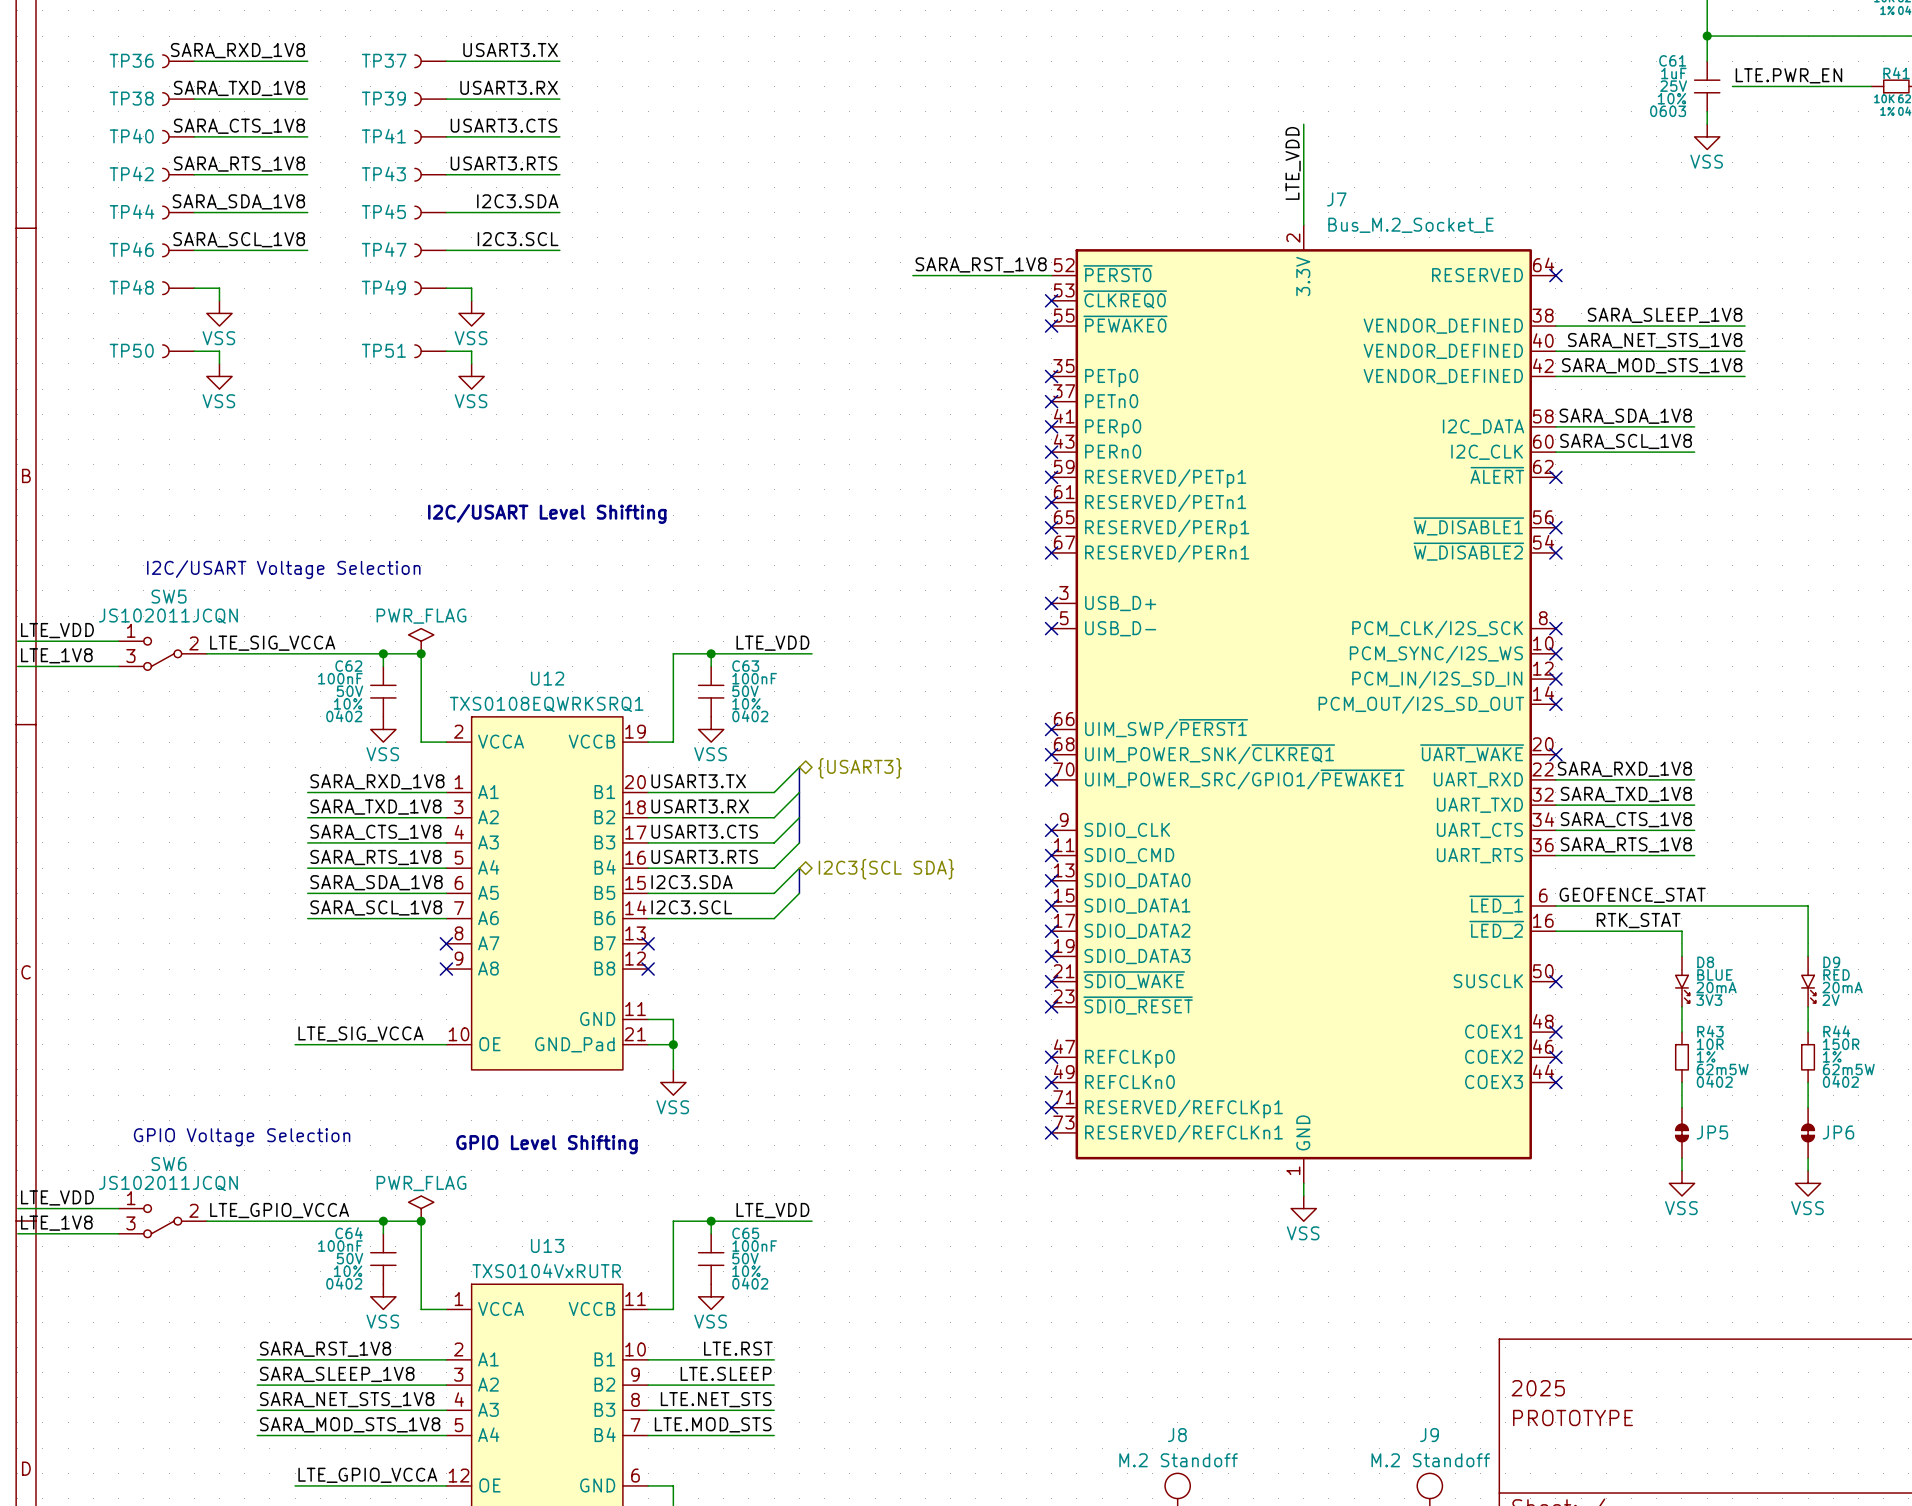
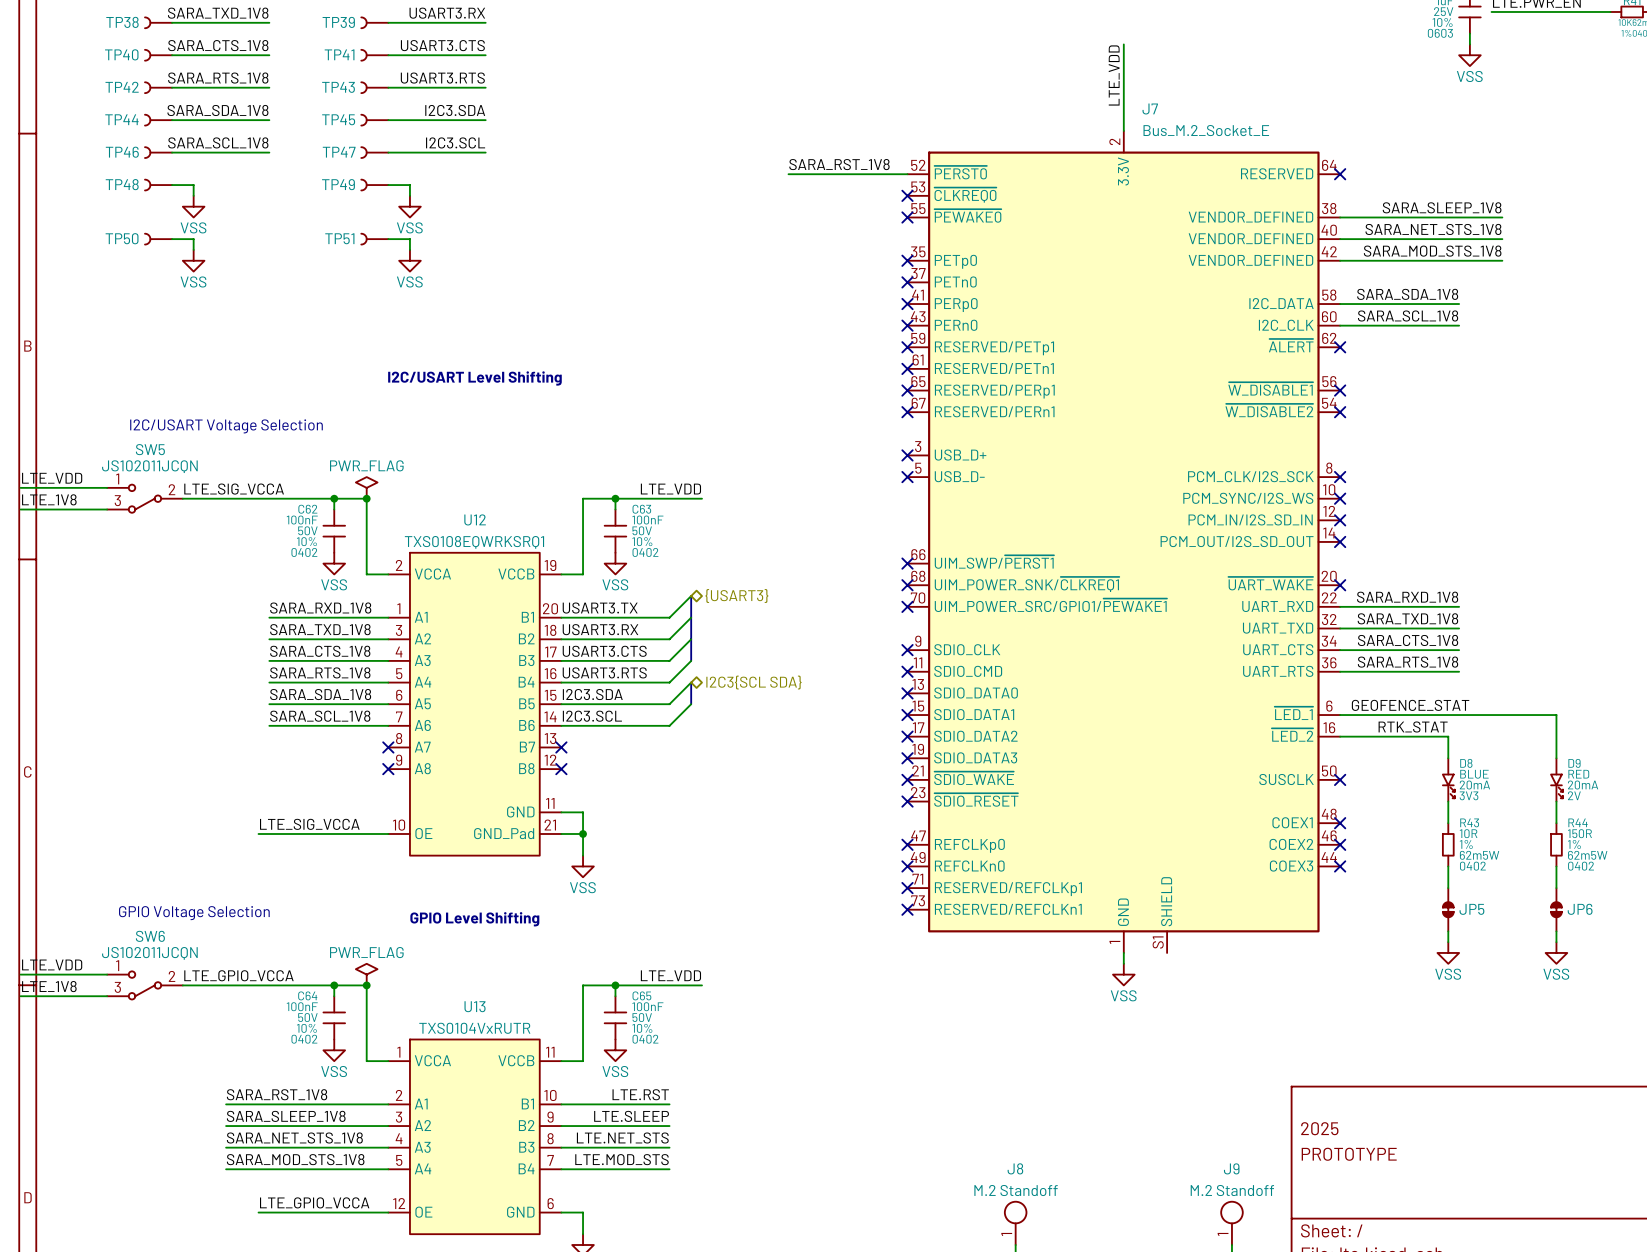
J7 symbol: [1051, 225, 1556, 1184] -> [907, 130, 1341, 953]

